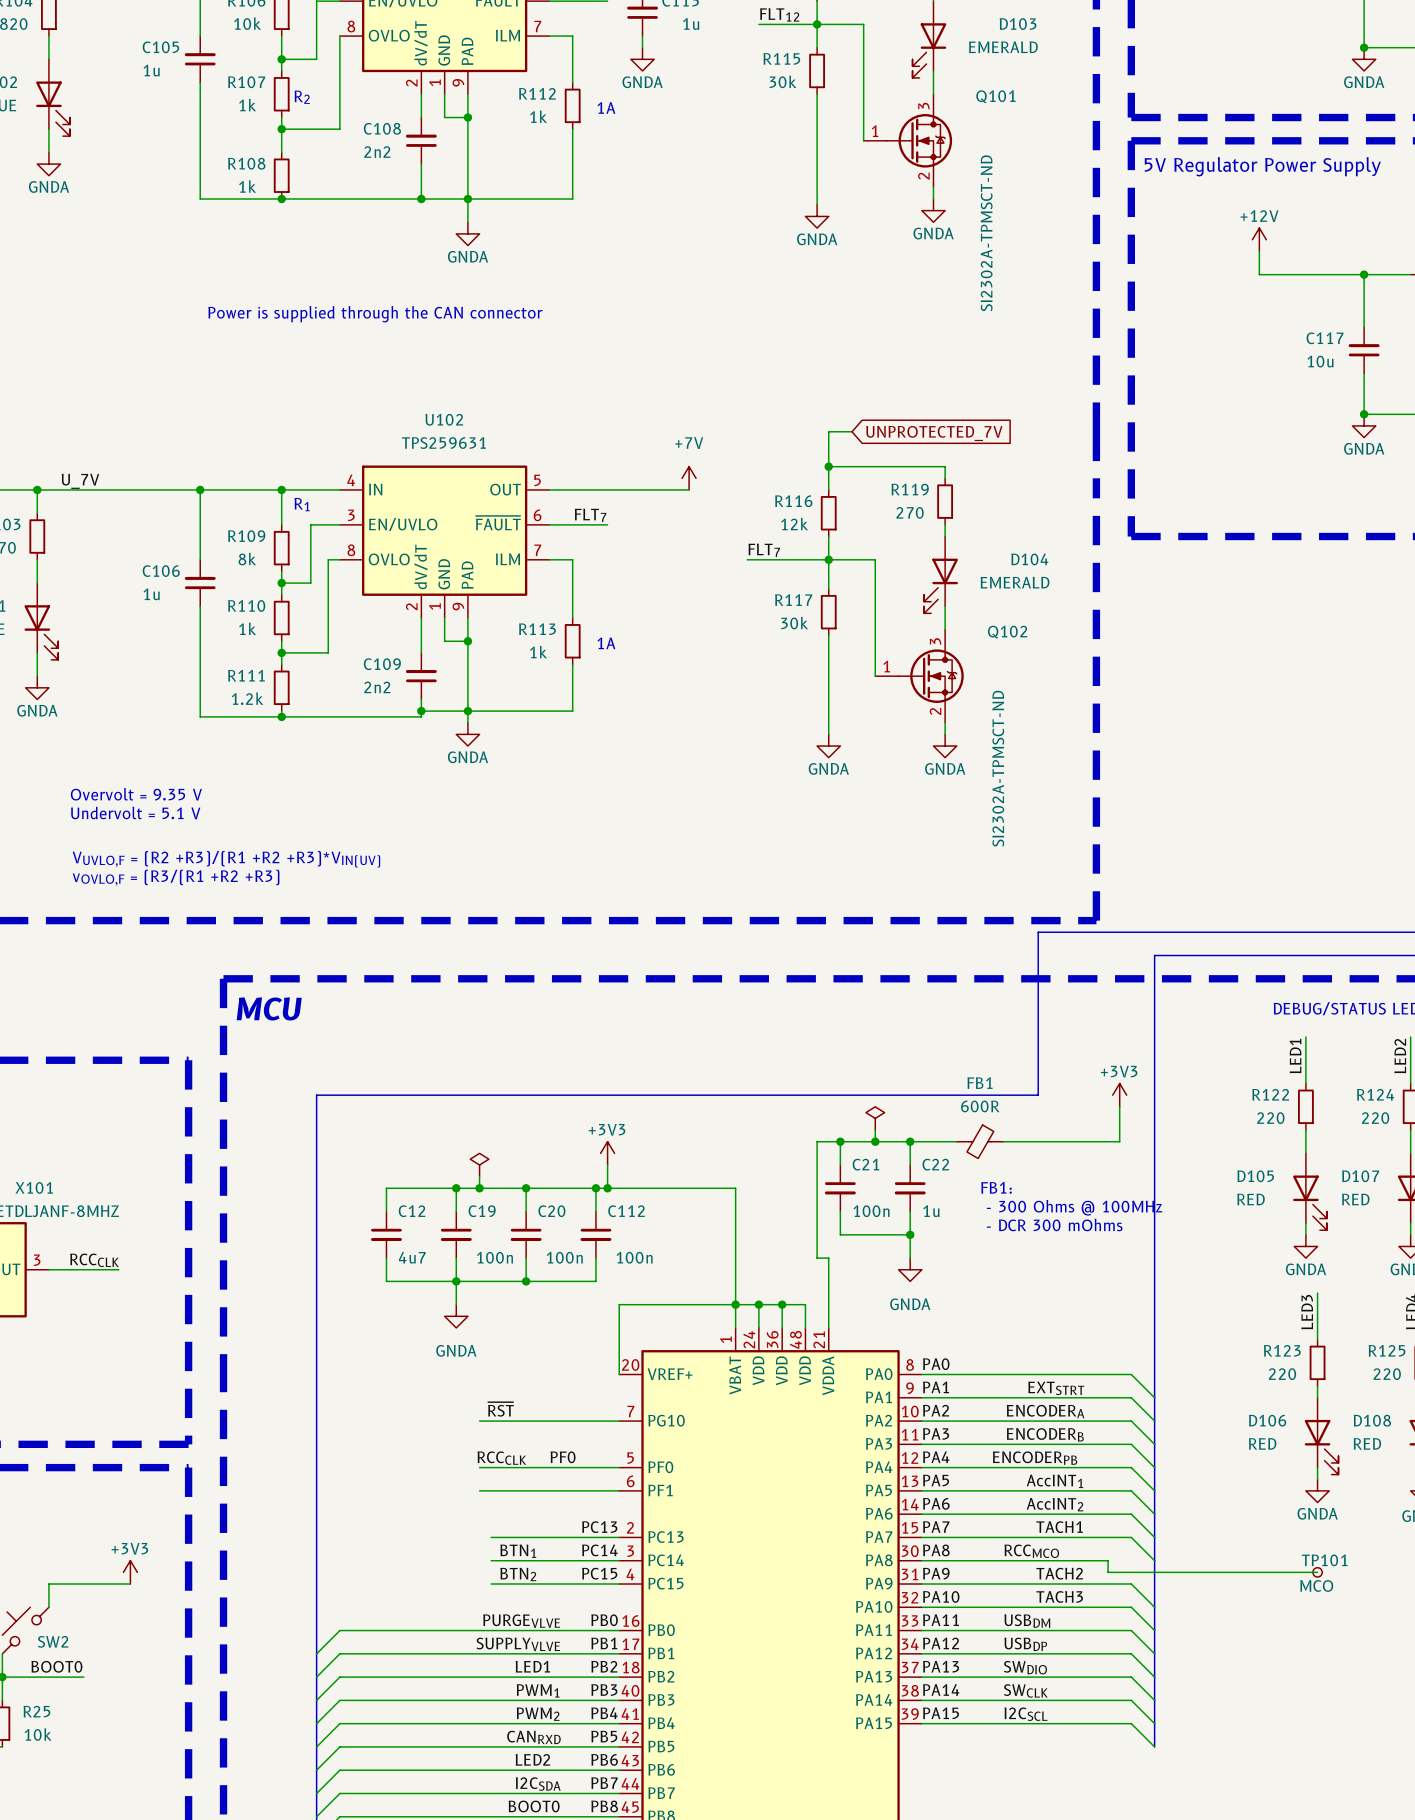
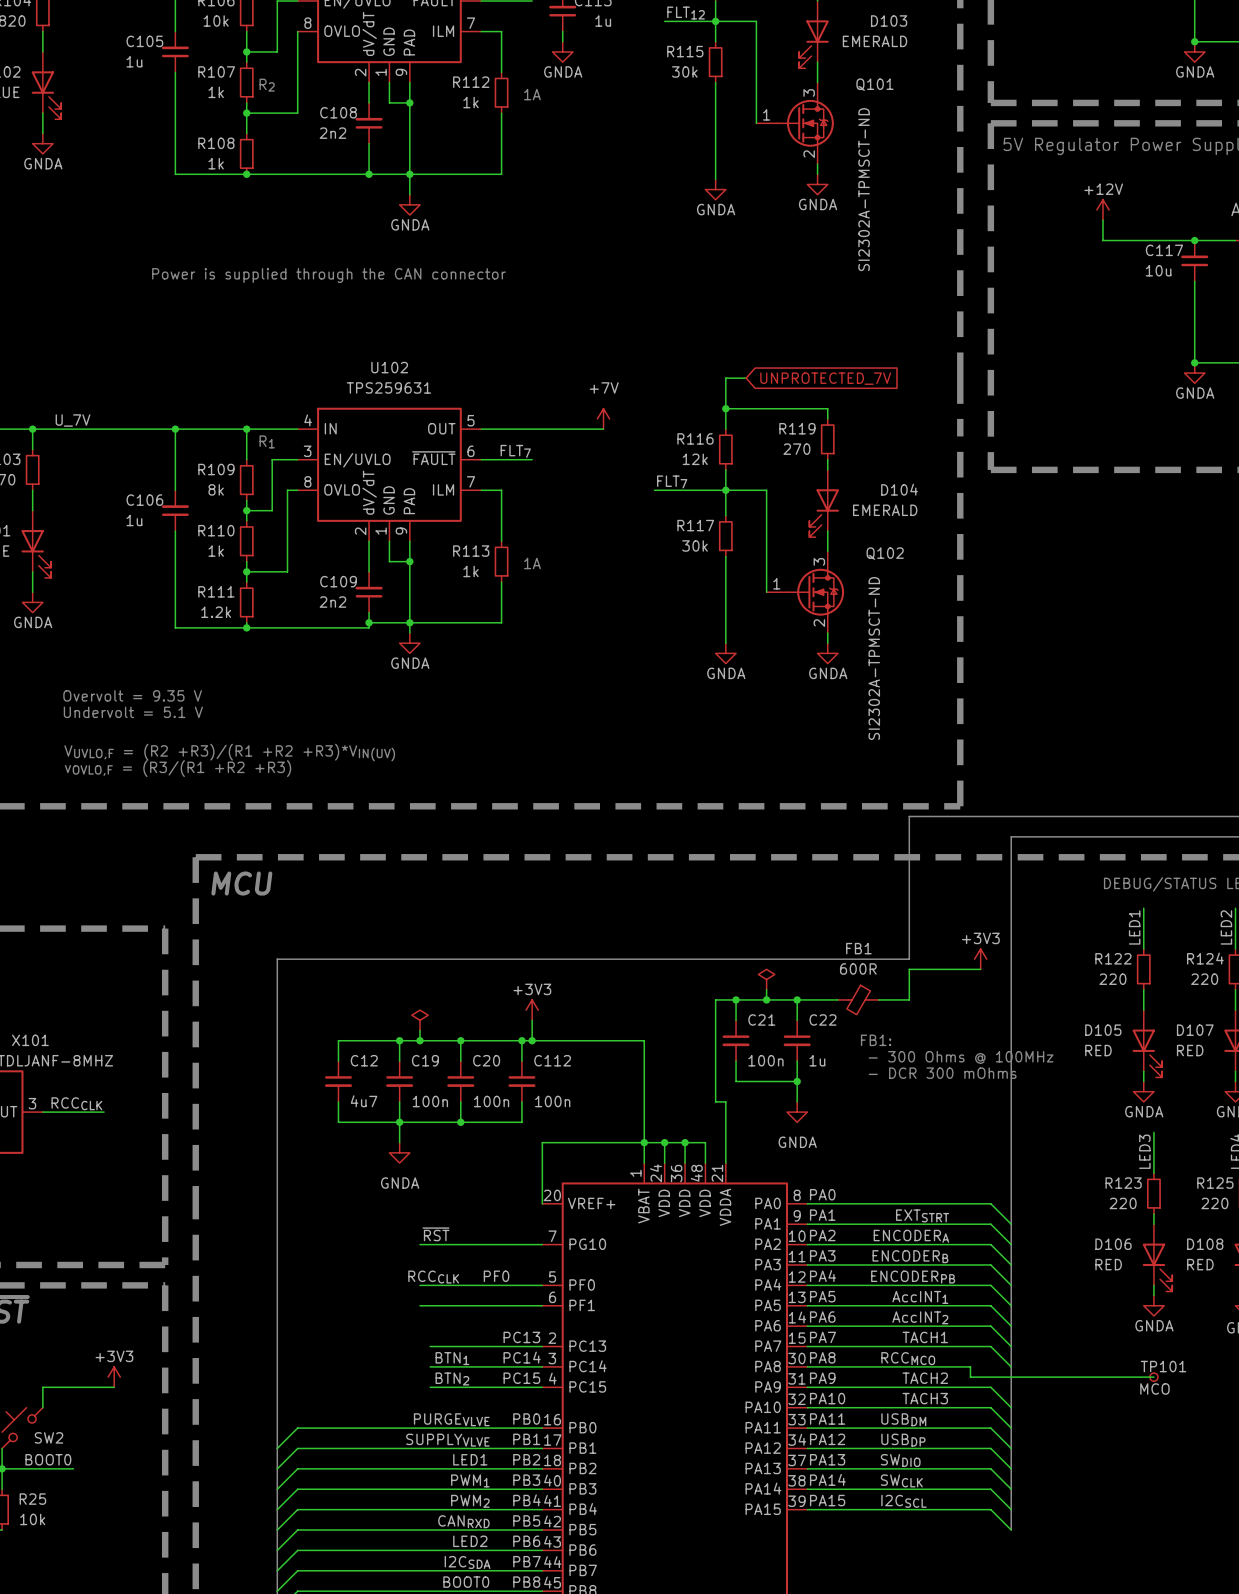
C117 position: (1364, 350) -> (1194, 260)
wire: (1119, 1106) (1119, 1141) (1038, 1141) -> (980, 969) (909, 969) (909, 999)

